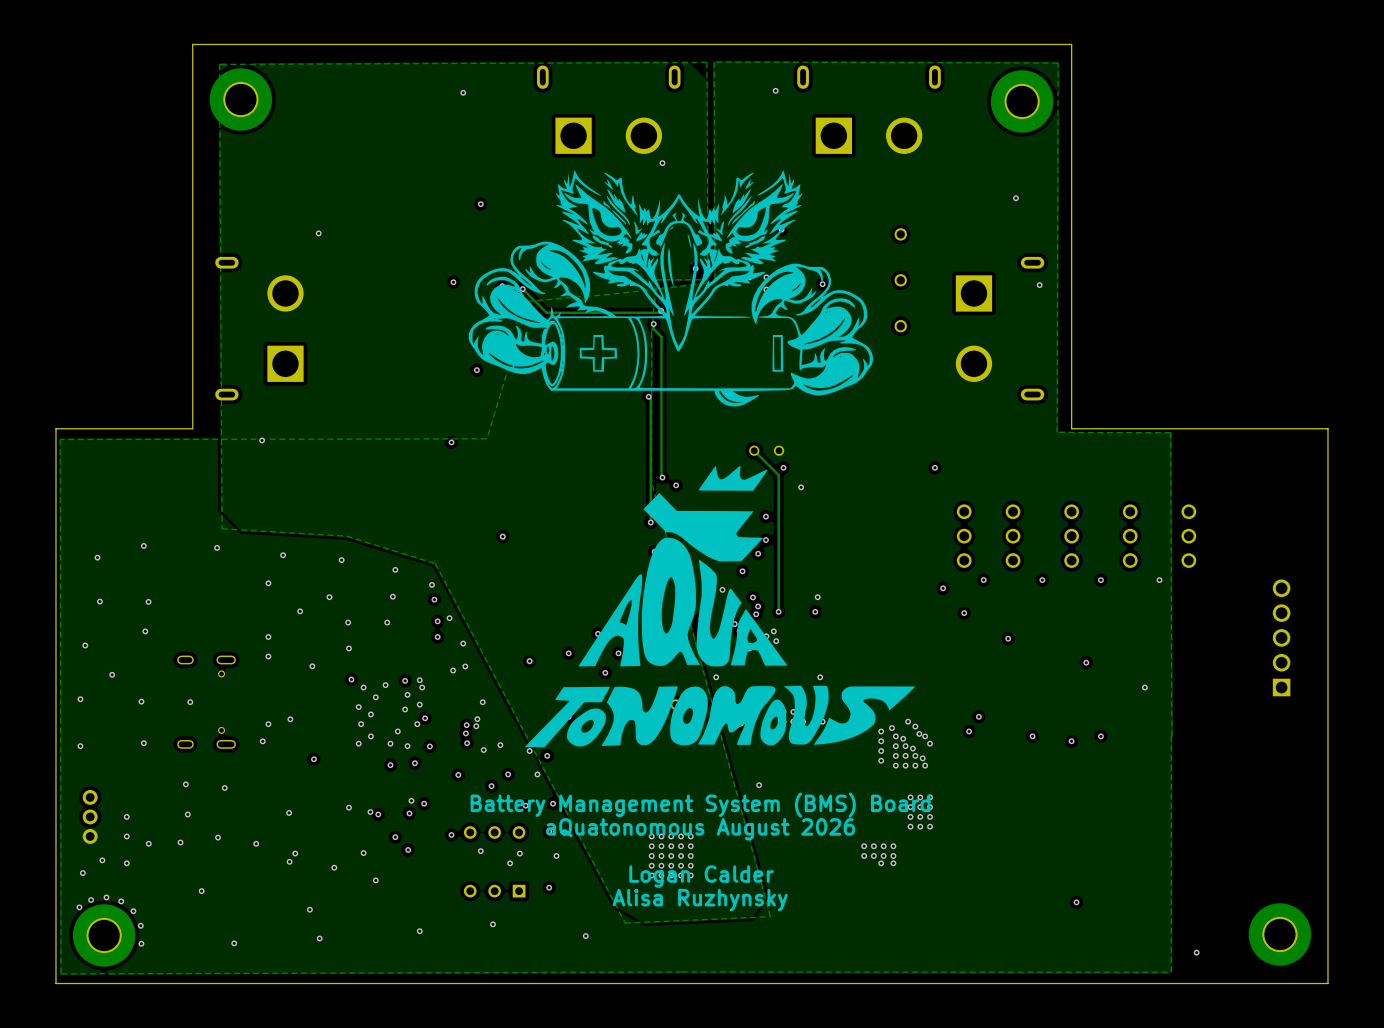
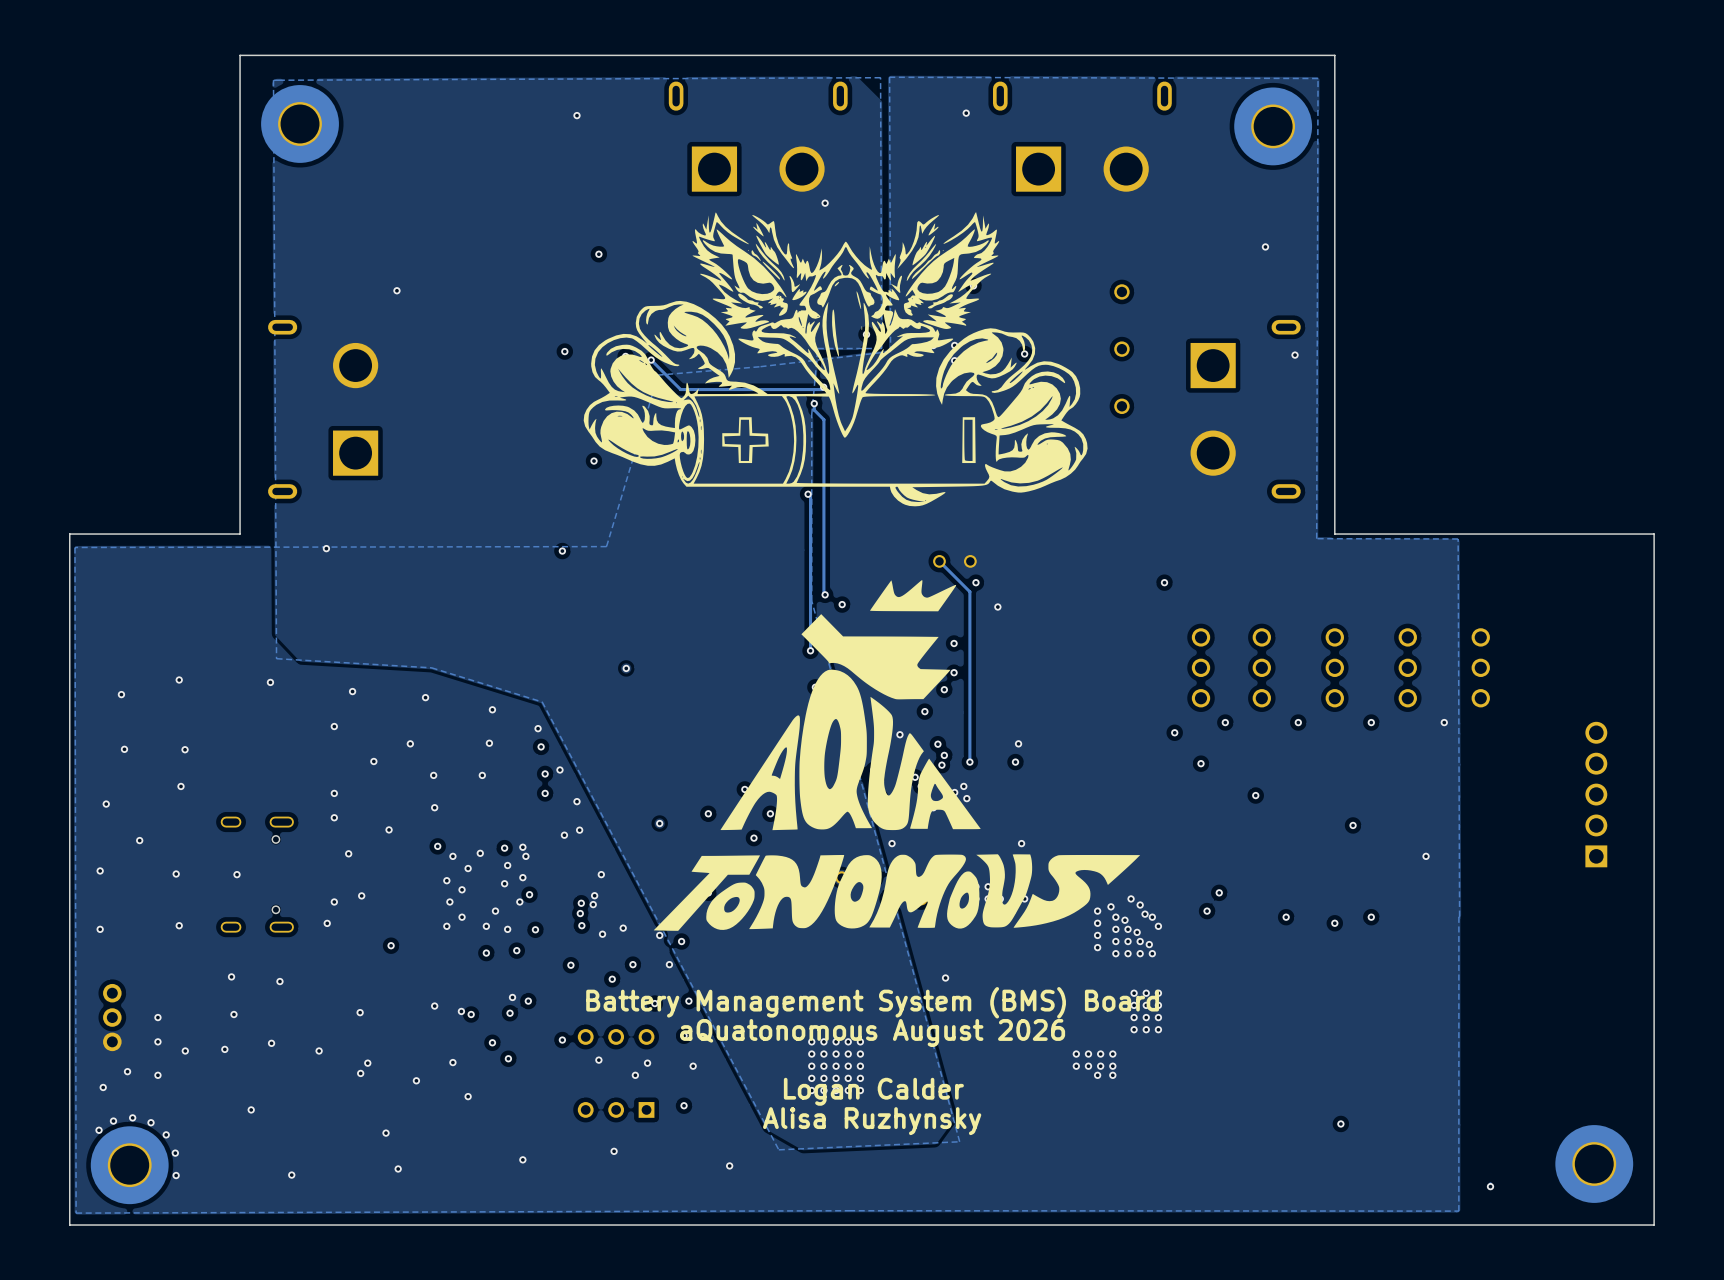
via: none -> (348, 853)

